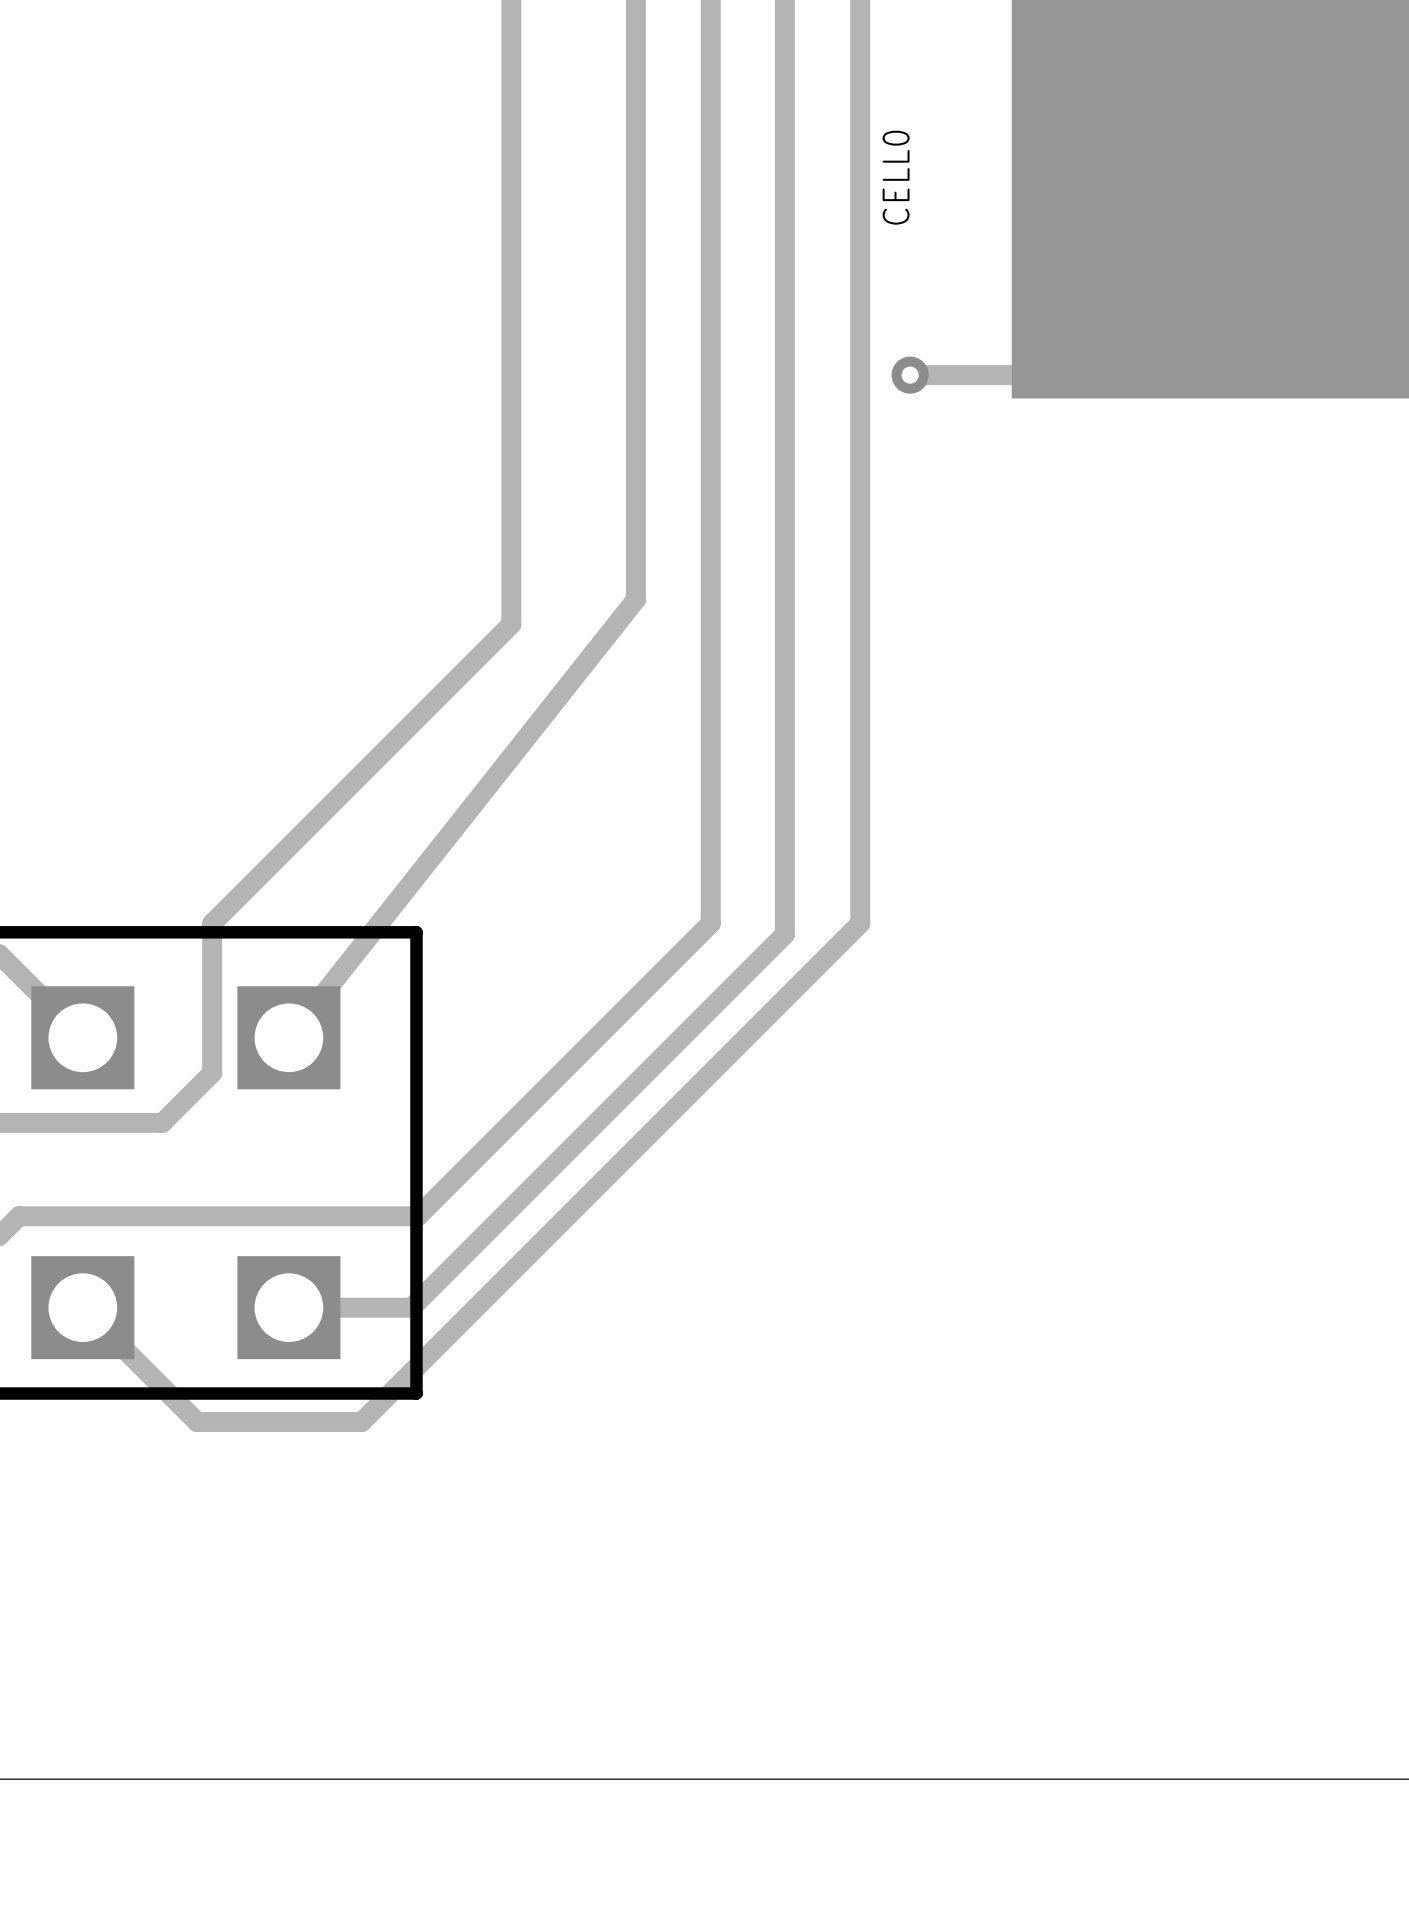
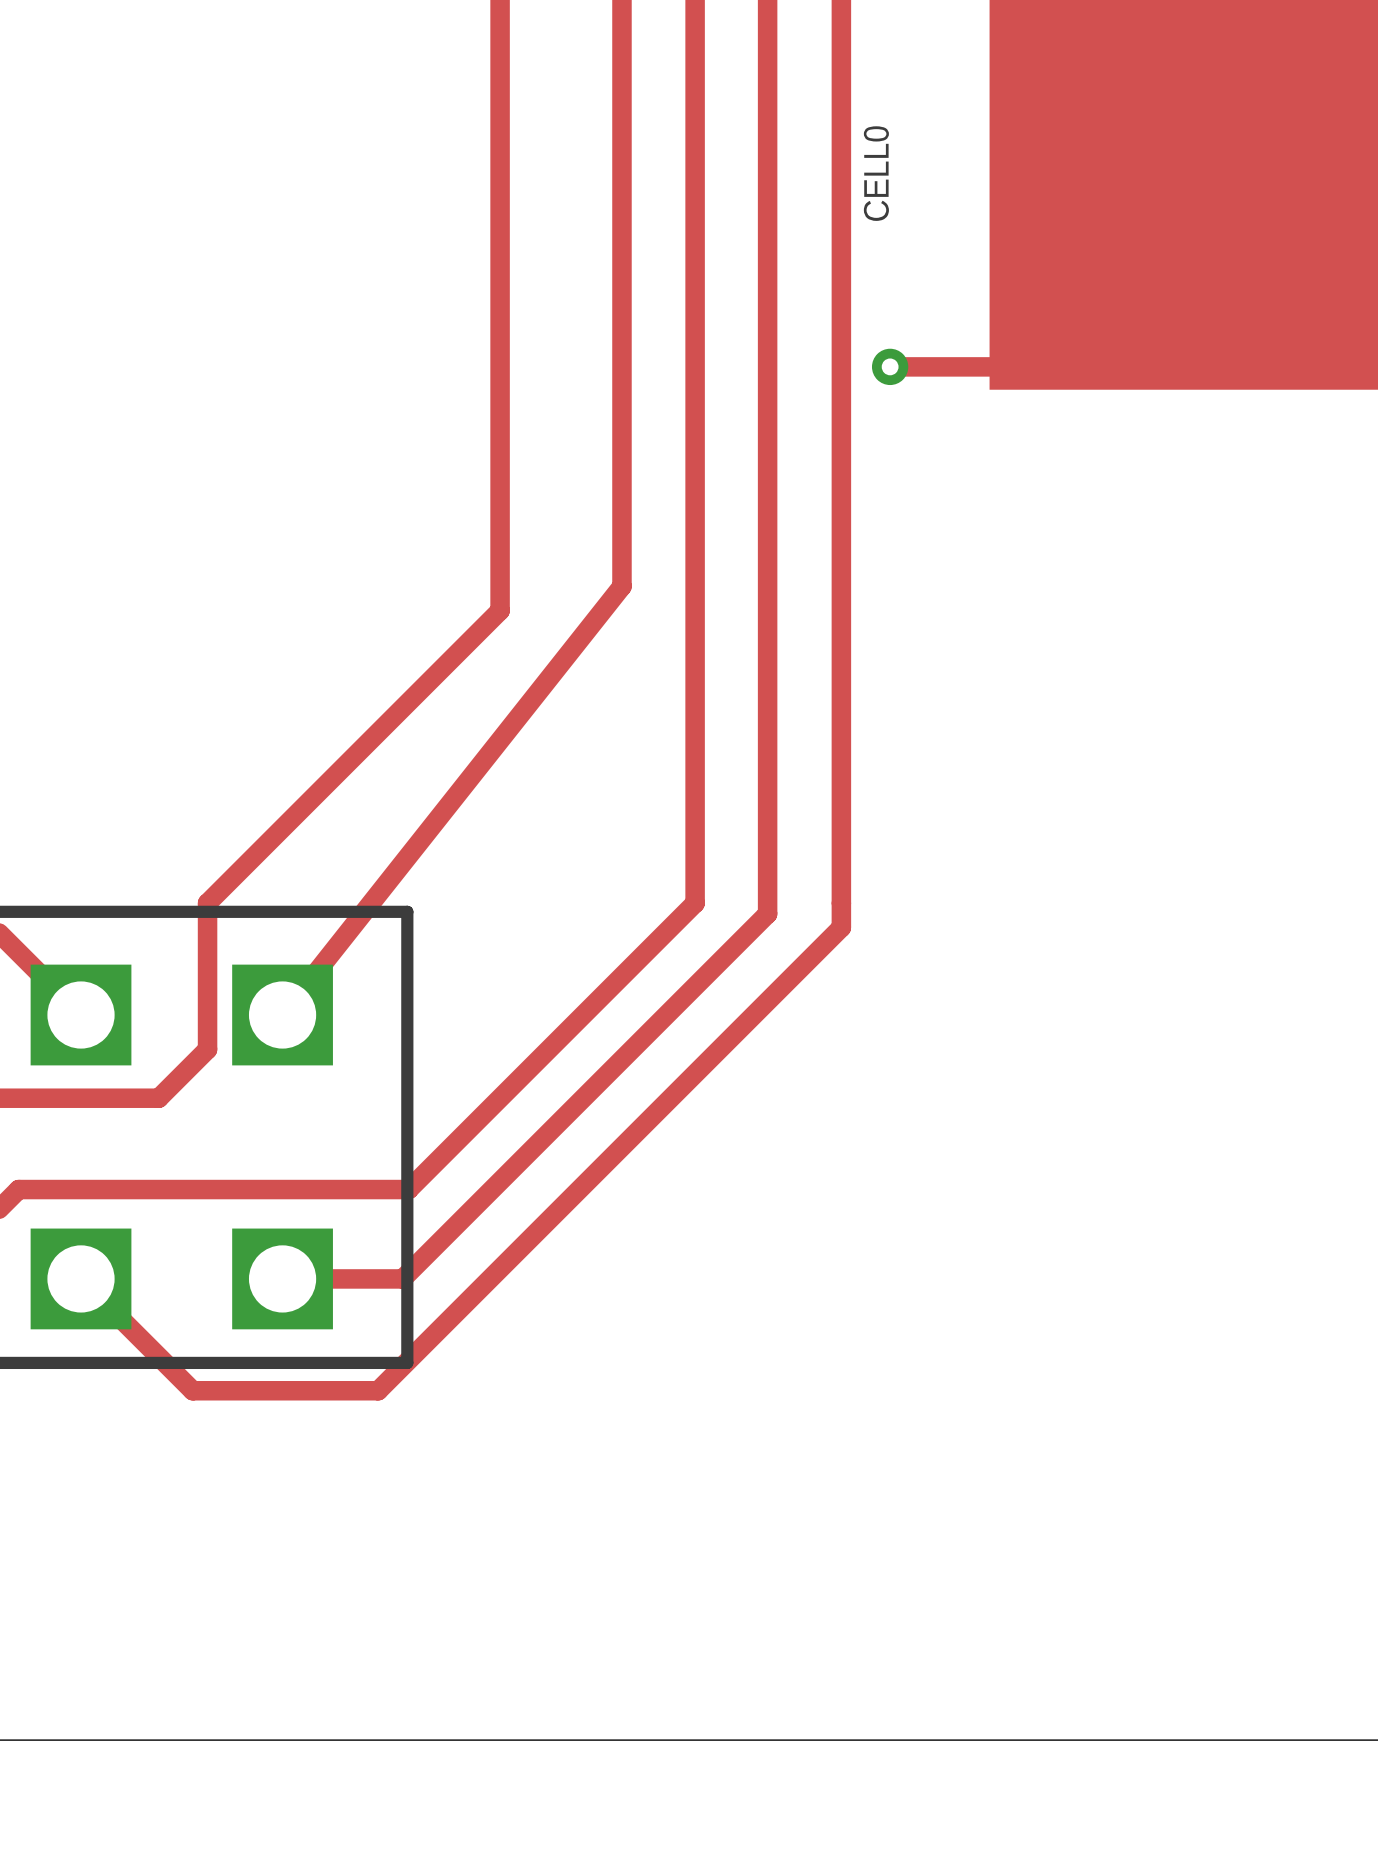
track: (860, 923) (361, 1421) -> (841, 903) (841, 927) (378, 1390) (353, 1390)

